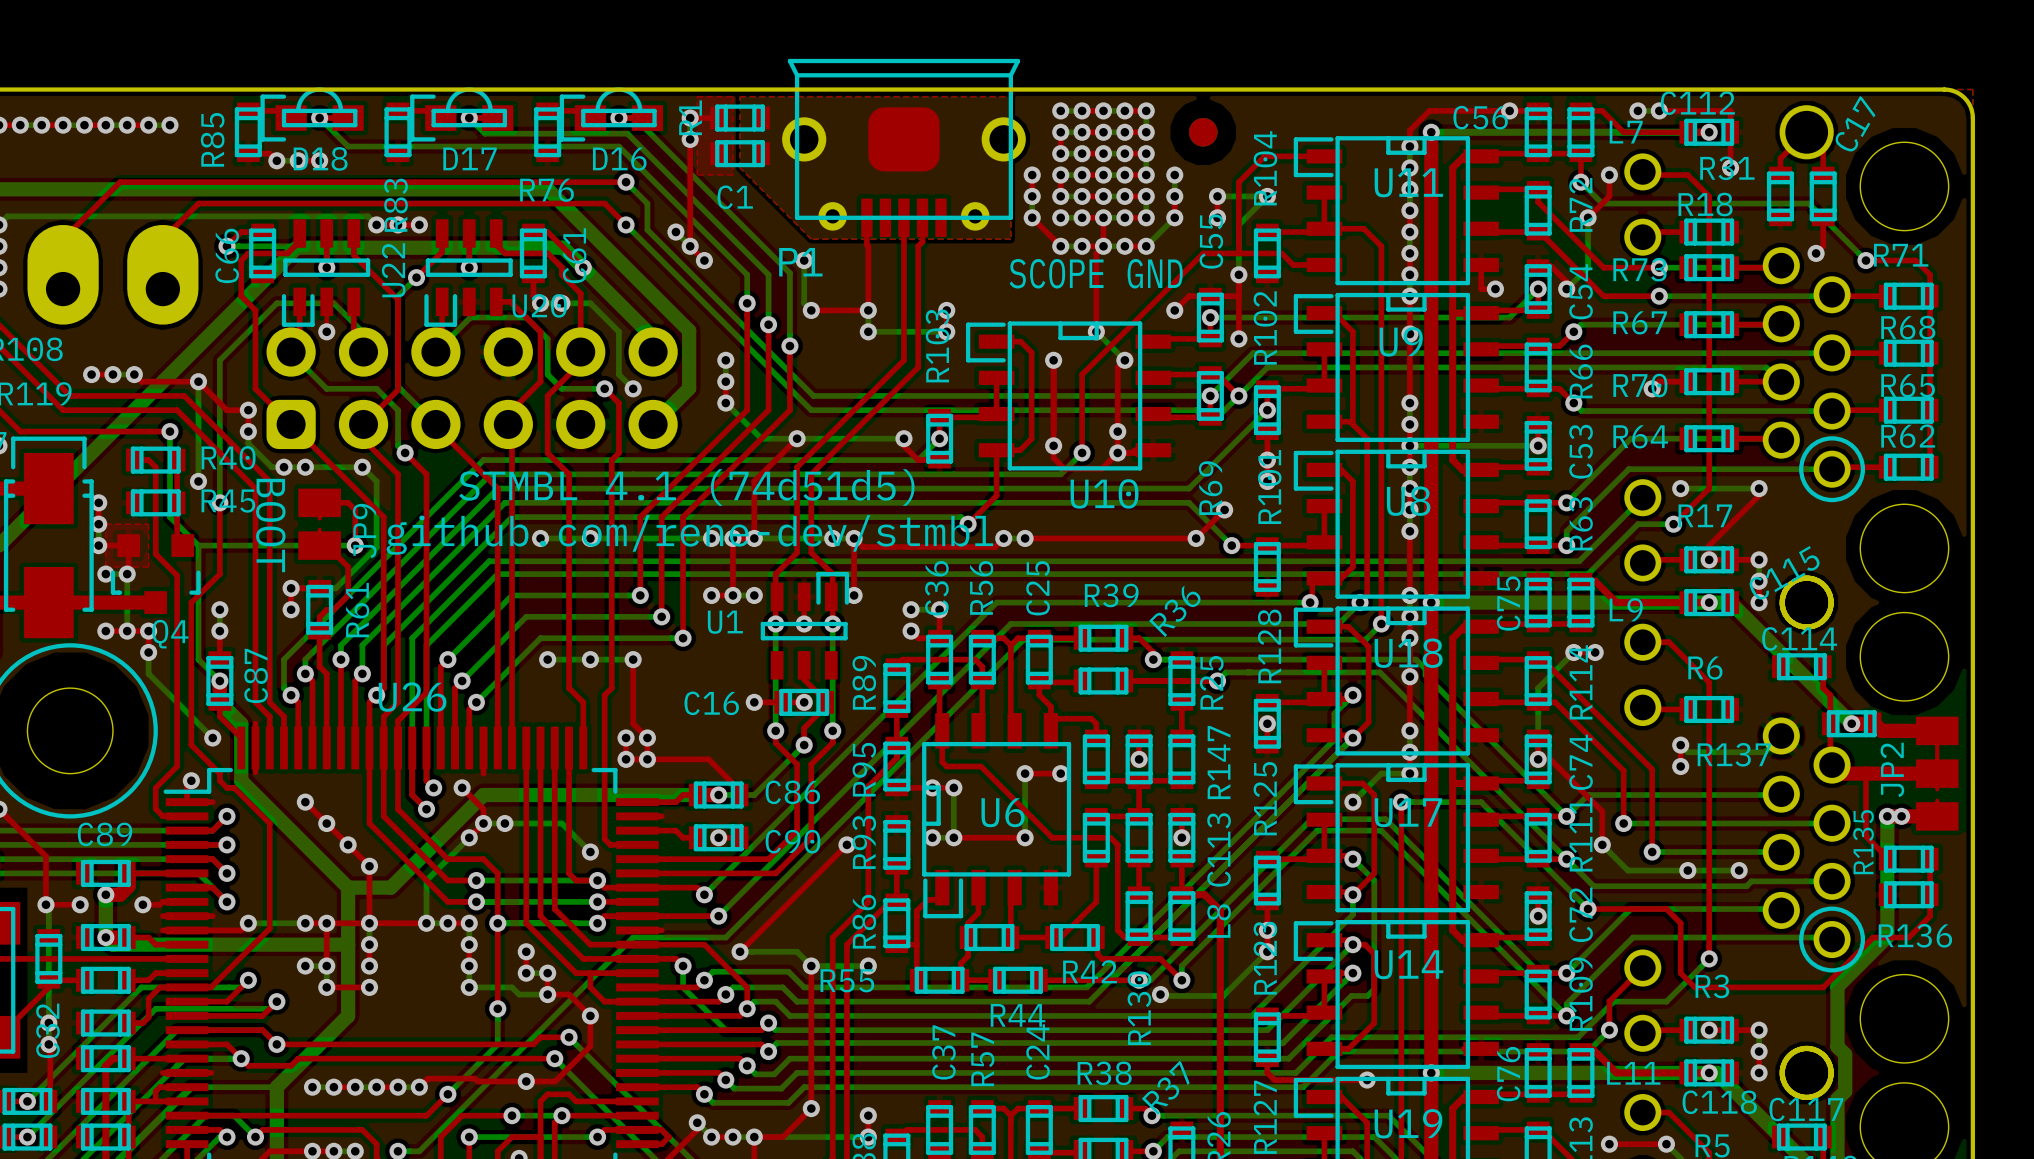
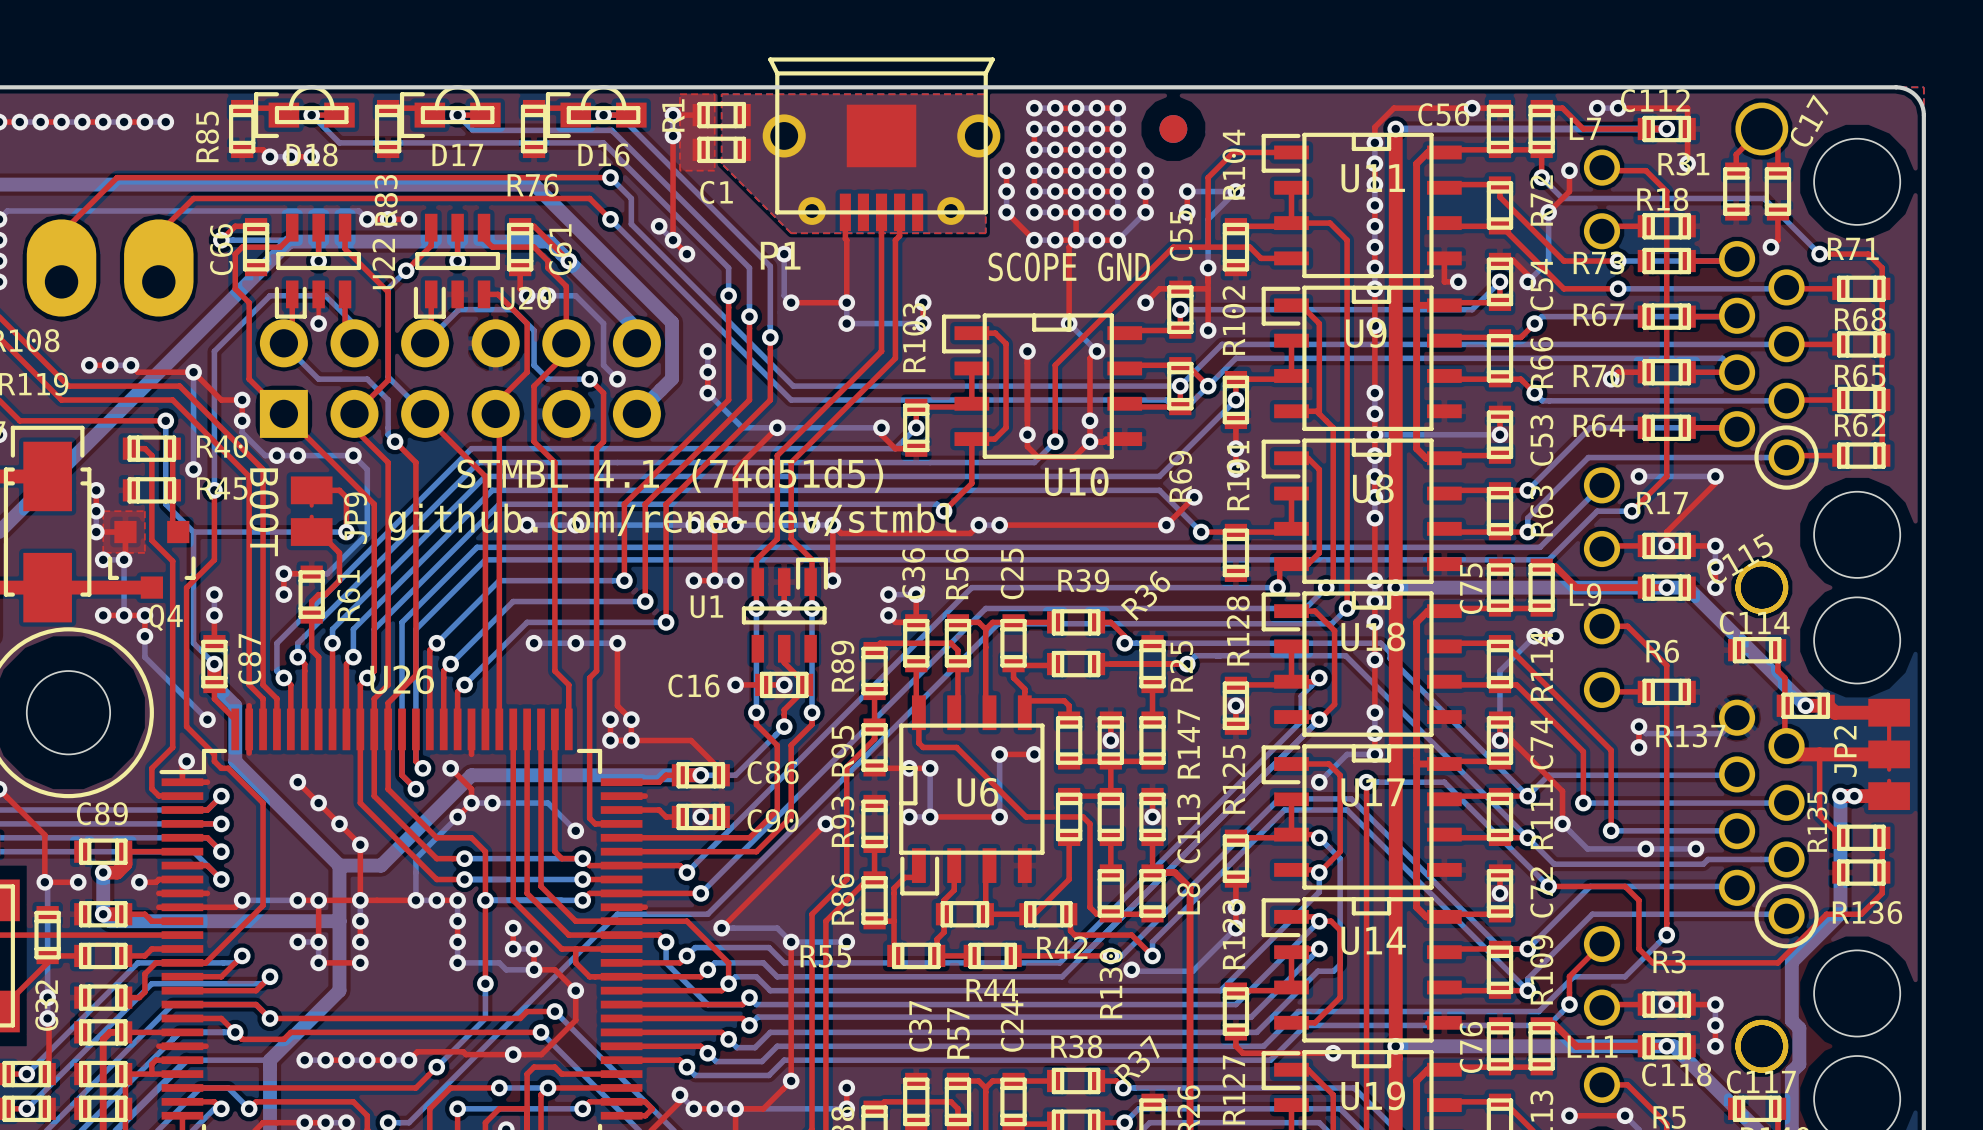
P1 footprint: [782, 58, 1026, 238] -> [762, 57, 1001, 232]
part footprint: [266, 327, 678, 450] -> [259, 319, 661, 438]

